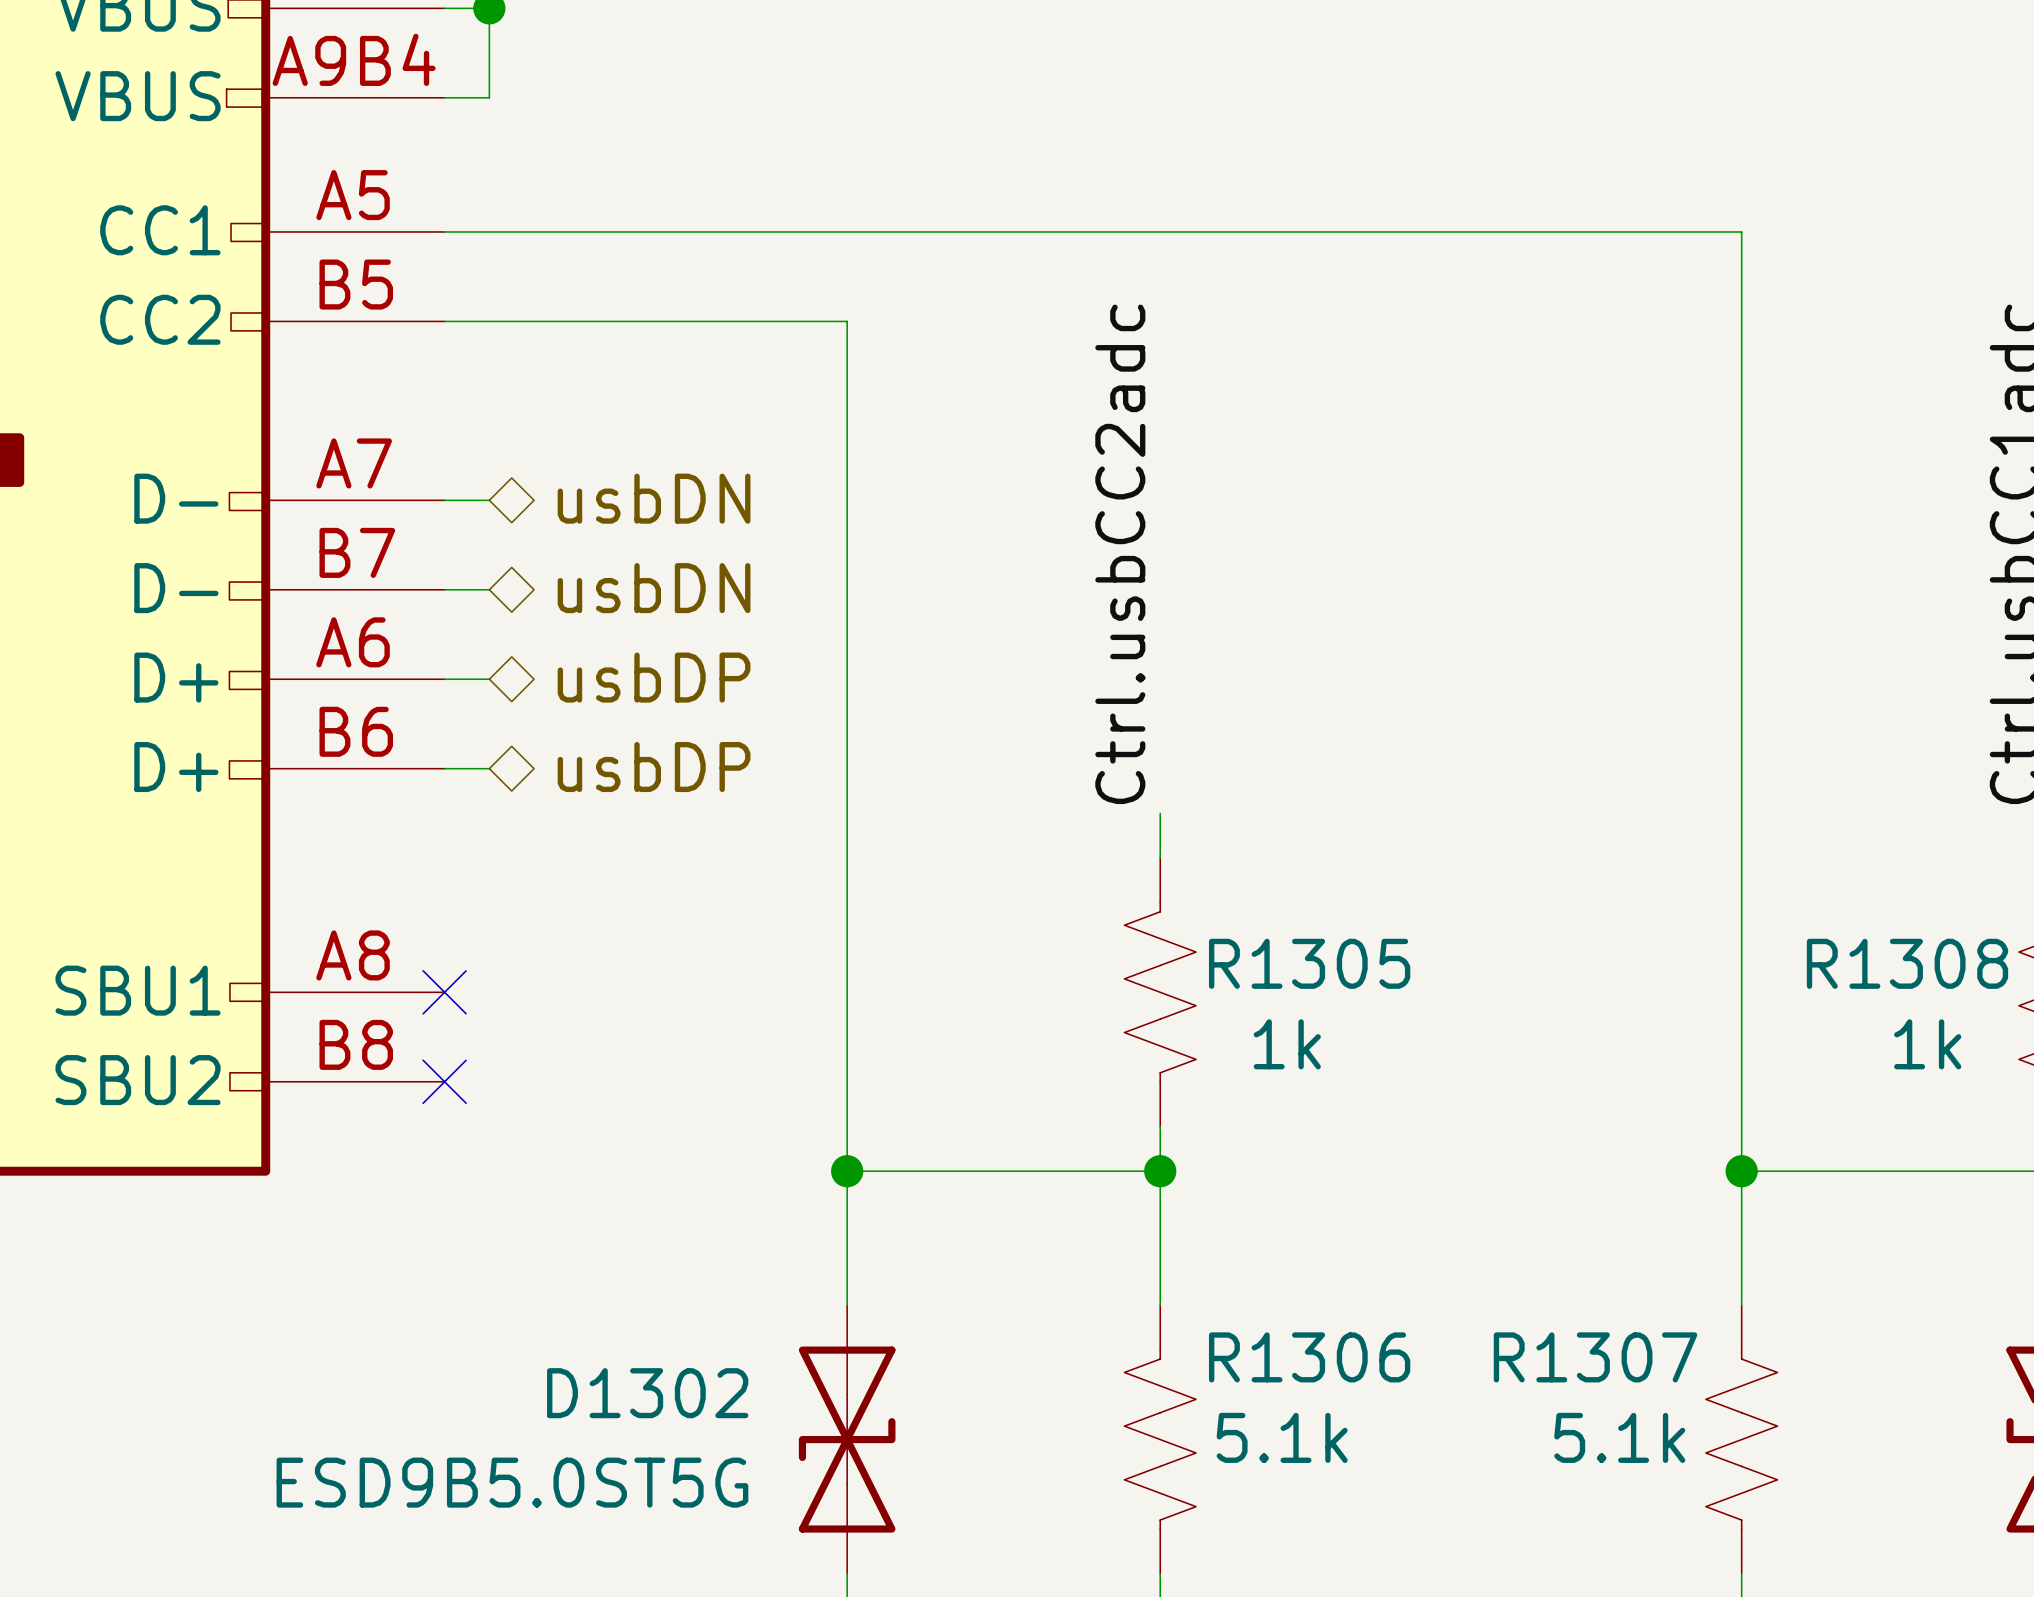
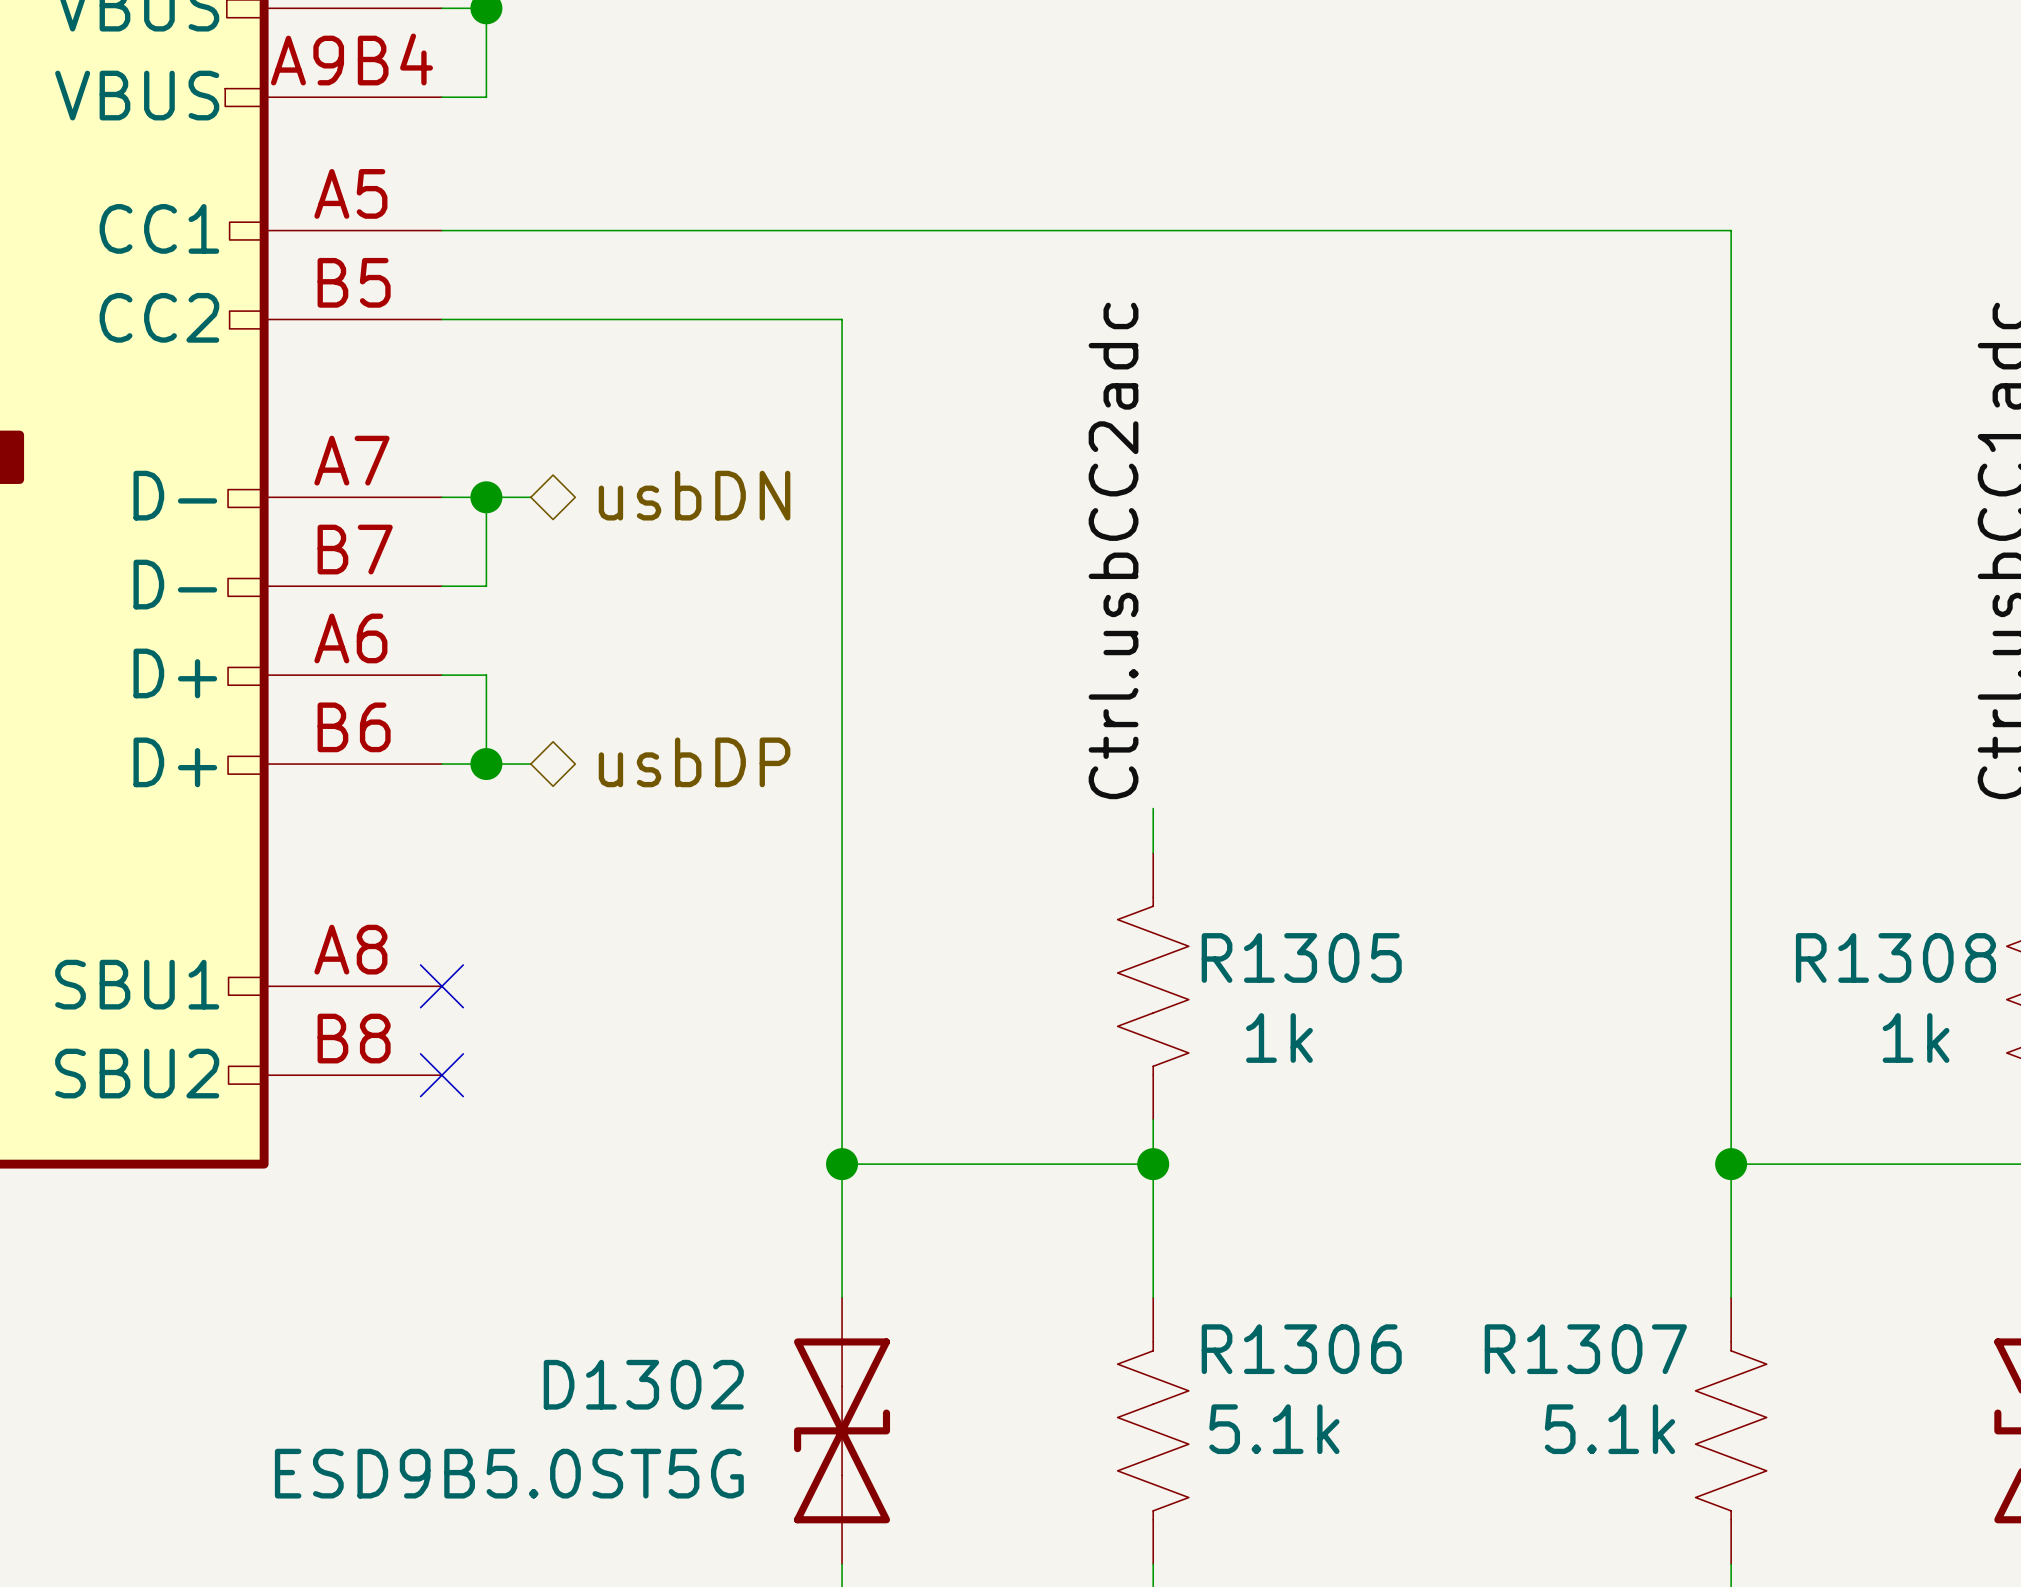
hierarchical label position: usbDN (654, 498) -> usbDN (694, 495)
junction: none -> (486, 497)
wire: none -> (530, 497) (486, 497) (486, 586)
hierarchical label: usbDN (654, 588) -> none
hierarchical label: usbDP (654, 677) -> none
wire: none -> (486, 675) (486, 764) (530, 764)
hierarchical label position: usbDP (654, 767) -> usbDP (694, 762)
junction: none -> (486, 764)

